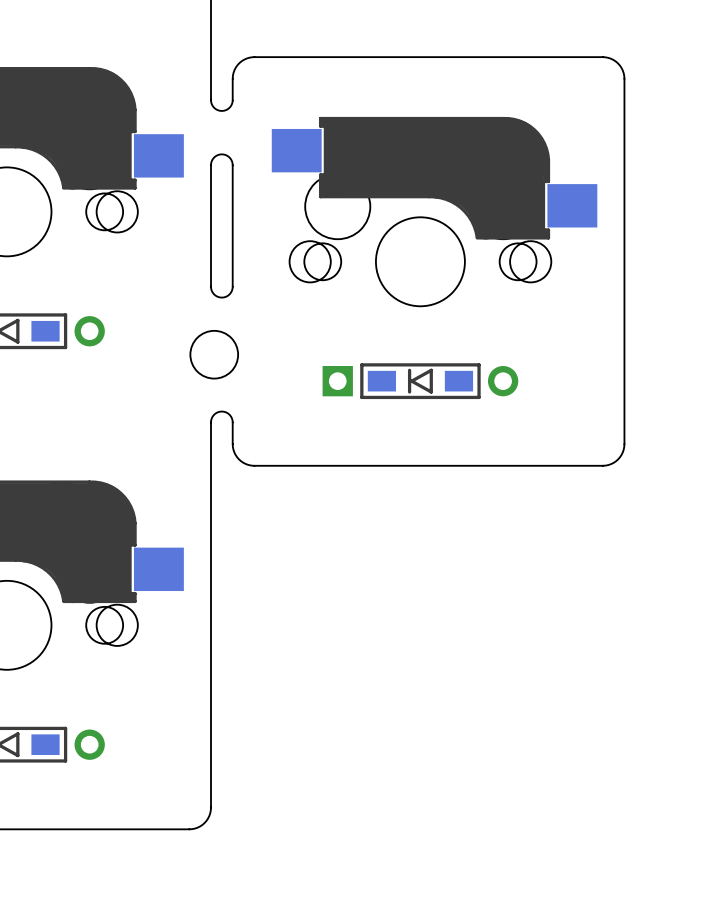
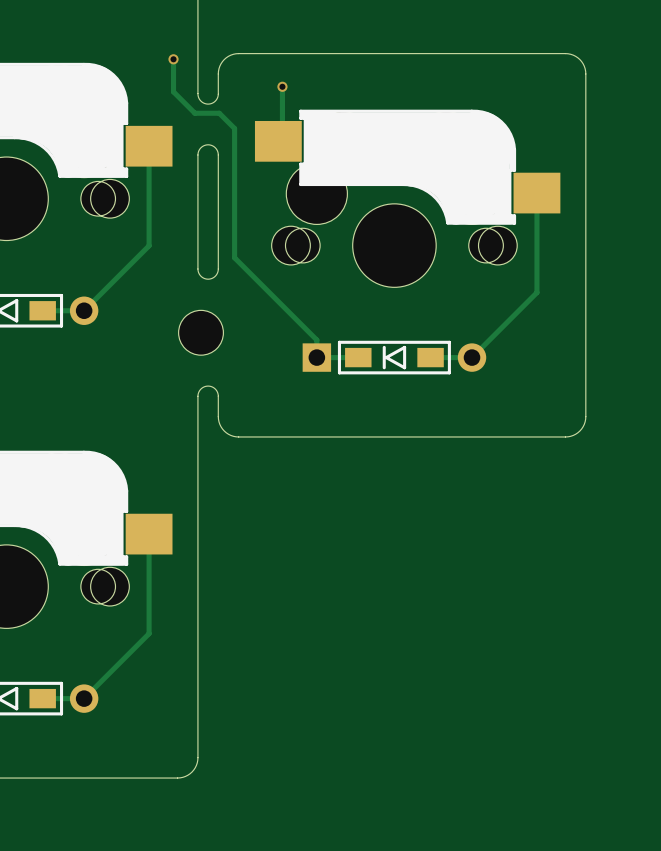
track: none -> (173, 59) (173, 91) (194, 113) (219, 113) (234, 128) (234, 257) (316, 340) (316, 357) (358, 357)
via: none -> (173, 59)
track: none -> (282, 86) (282, 137) (278, 141)
via: none -> (282, 86)
track: none -> (149, 146) (149, 245) (84, 310) (42, 310)
track: none -> (536, 193) (536, 292) (472, 357) (430, 357)
track: none -> (149, 534) (149, 633) (84, 698) (42, 698)

